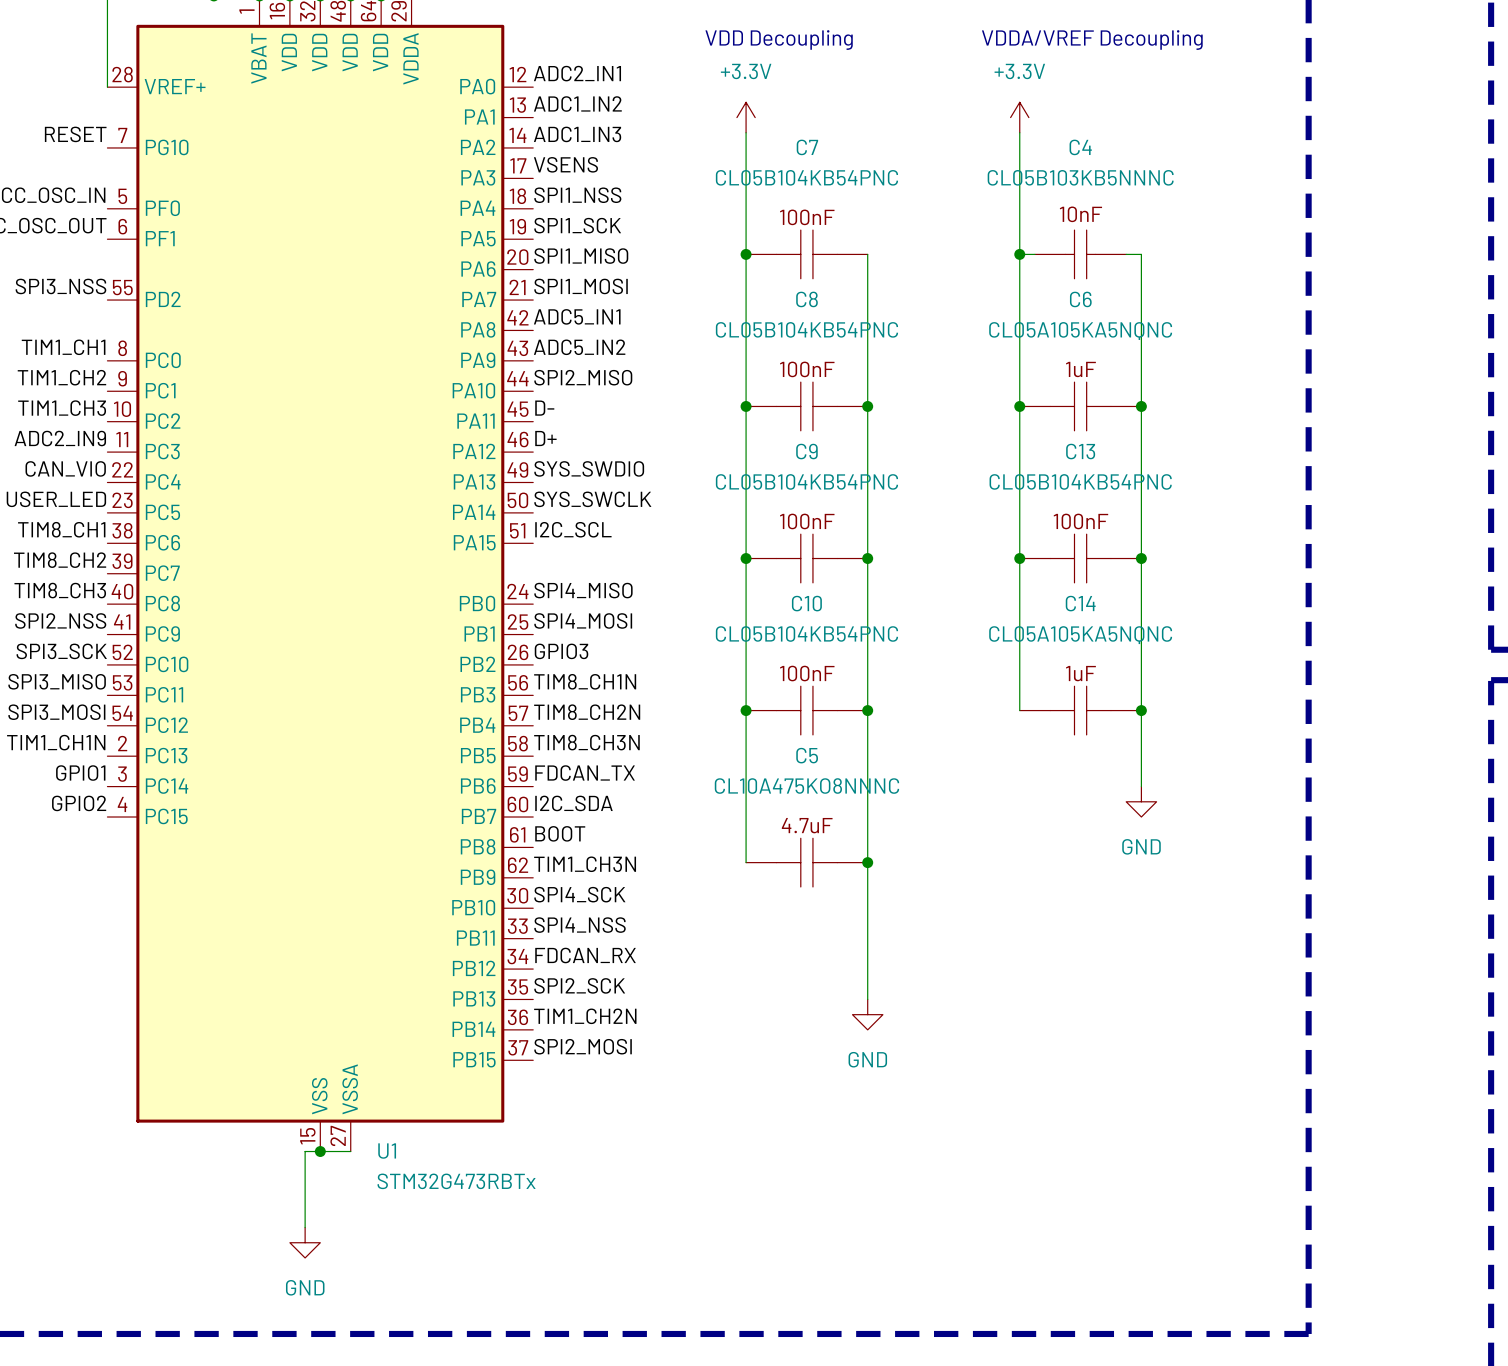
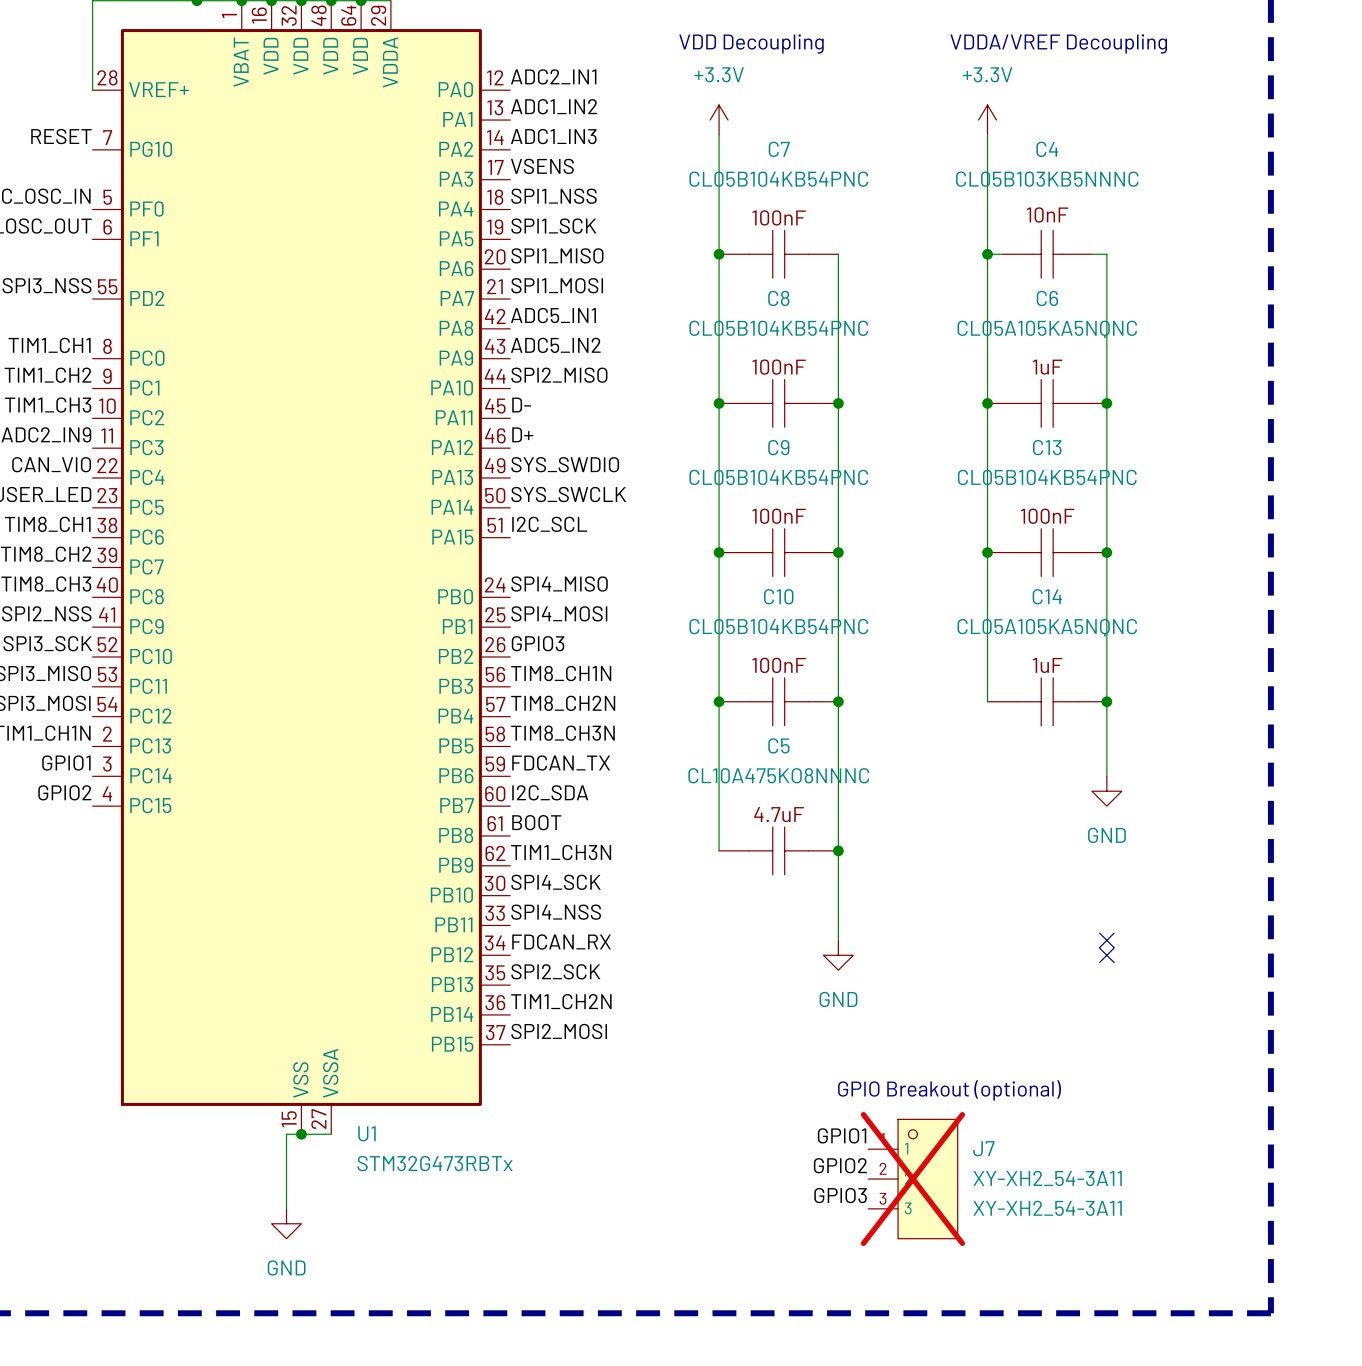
wire: (867, 953) (867, 999) -> none
no-connect mark: none -> (1106, 940)
no-connect mark: none -> (1106, 955)
power symbol position: GND (867, 1014) -> GND (838, 955)
text: none -> GPIO Breakout (optional) (949, 1090)
label: none -> GPIO1 (842, 1135)
label: none -> GPIO2 (840, 1165)
J7: none -> XY-XH2_54-3A11 (912, 1179)
label: none -> GPIO3 (840, 1195)

